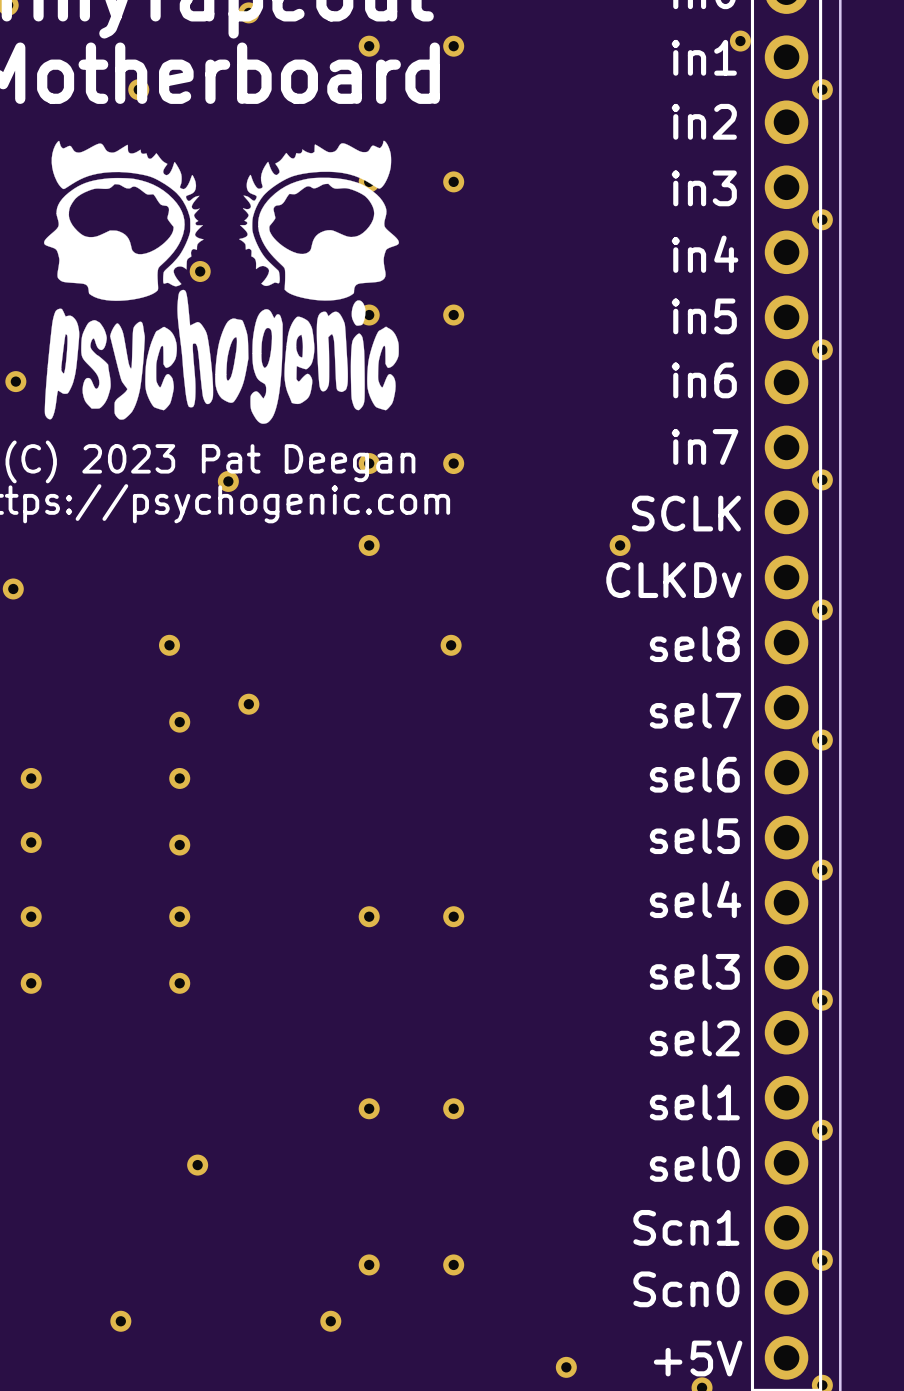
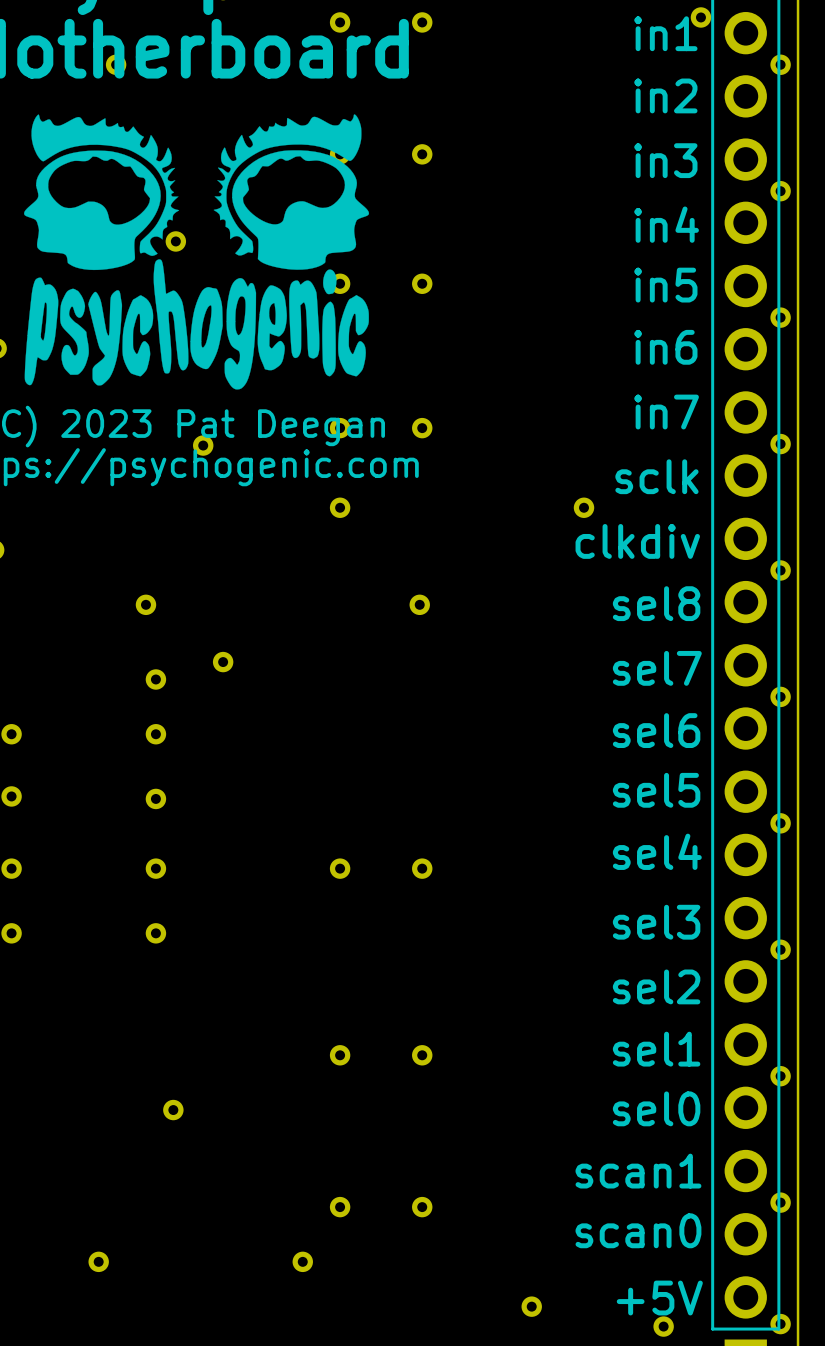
text: SCLK (686, 513) -> sclk (656, 476)
text: CLKDv (673, 580) -> clkdiv (637, 541)
text: Scn1 (686, 1227) -> scan1 (638, 1171)
text: Scn0 (686, 1289) -> scan0 (638, 1230)

